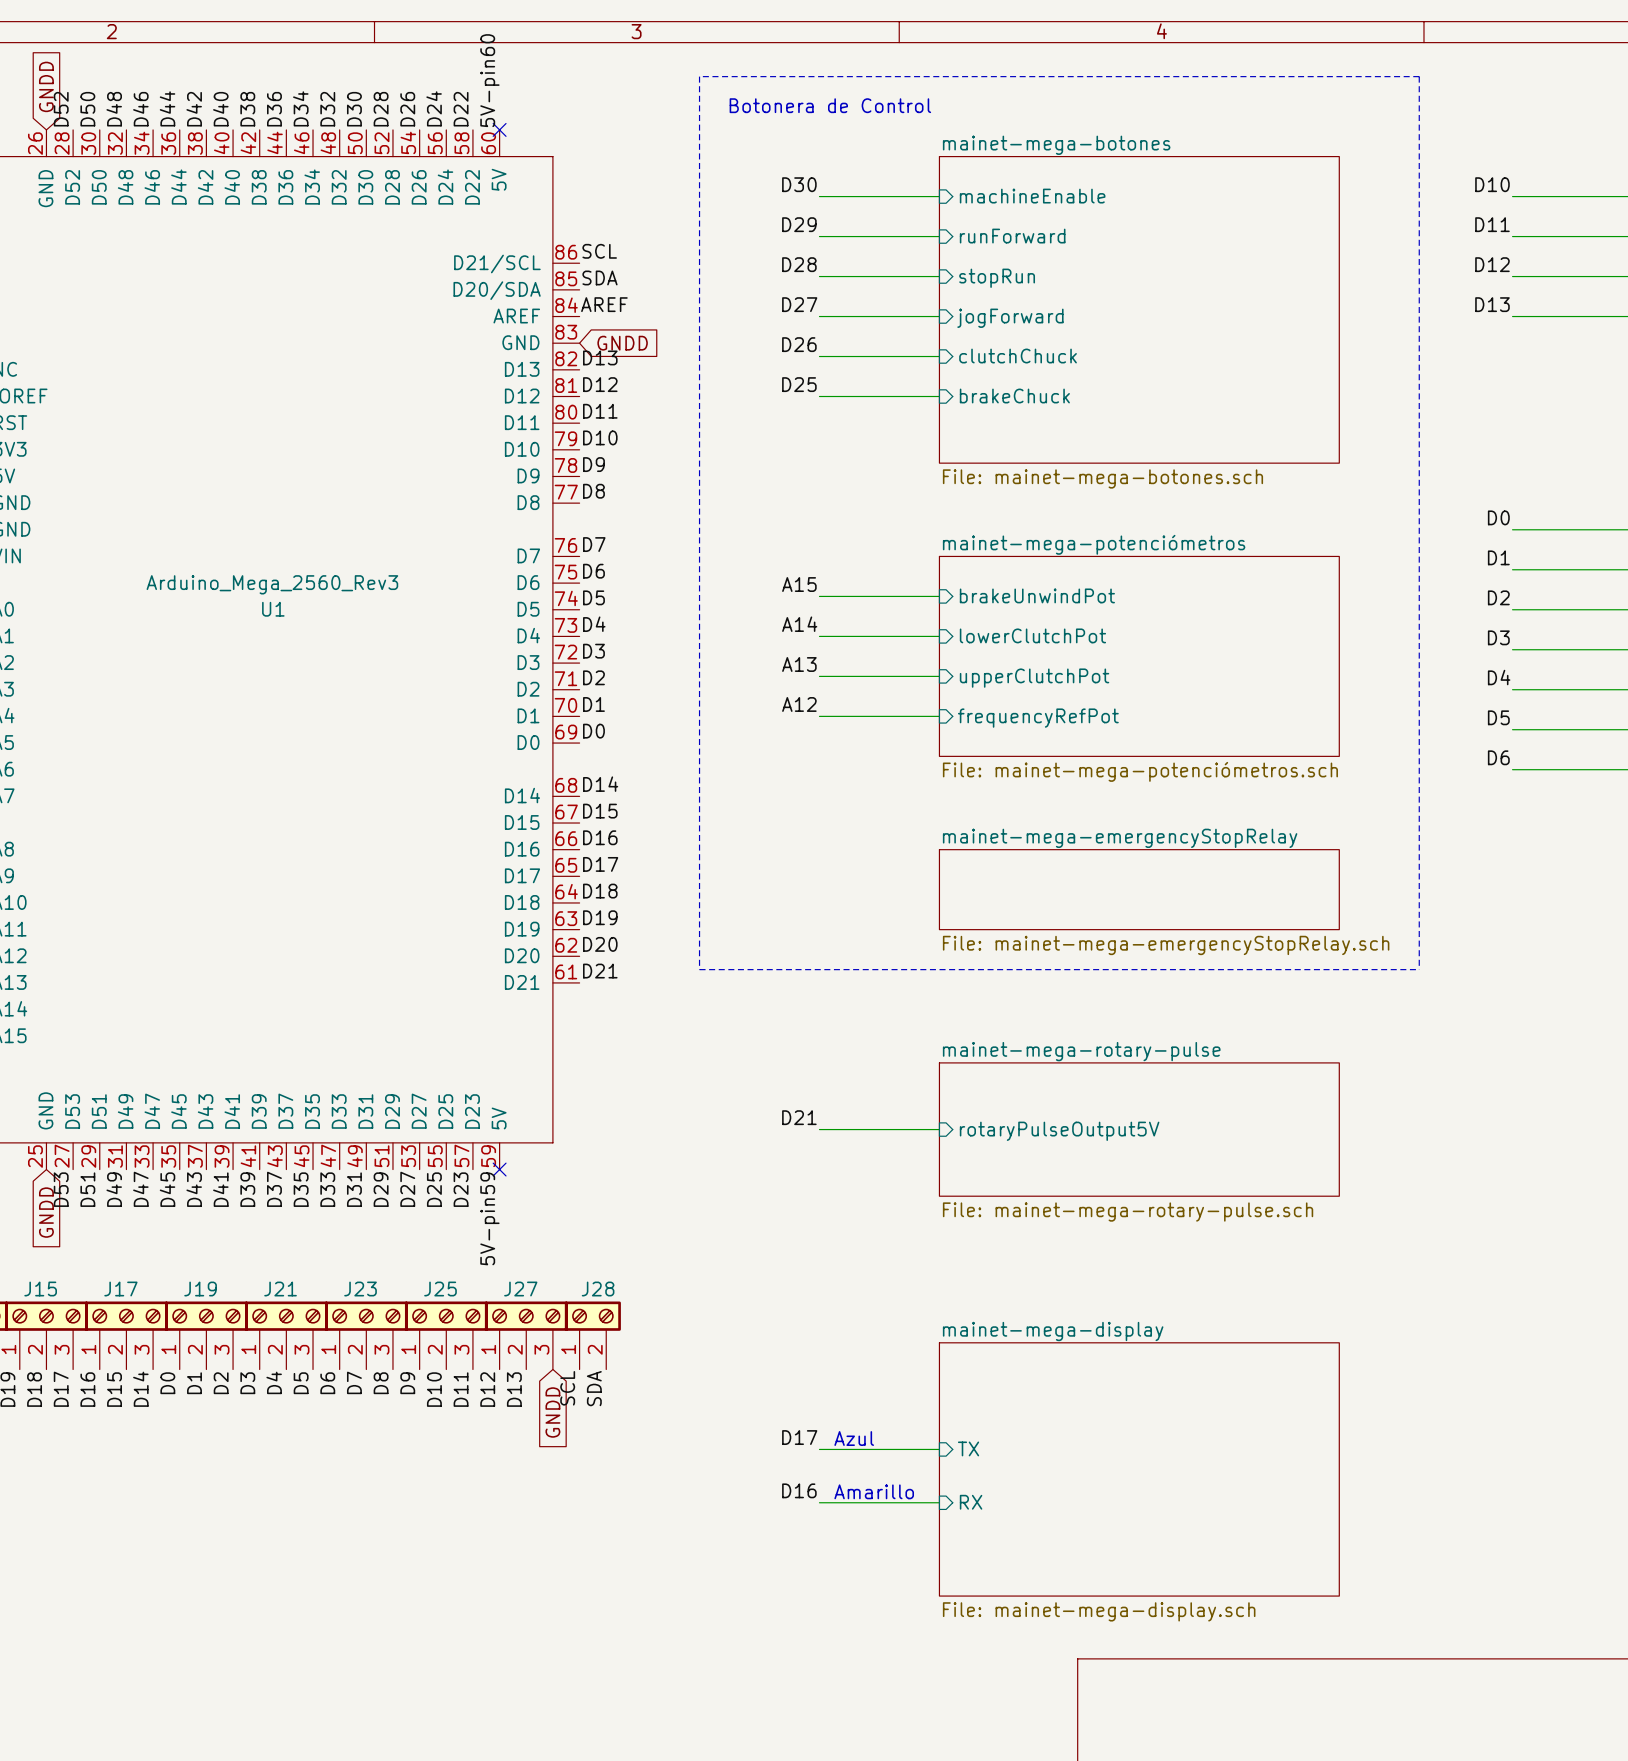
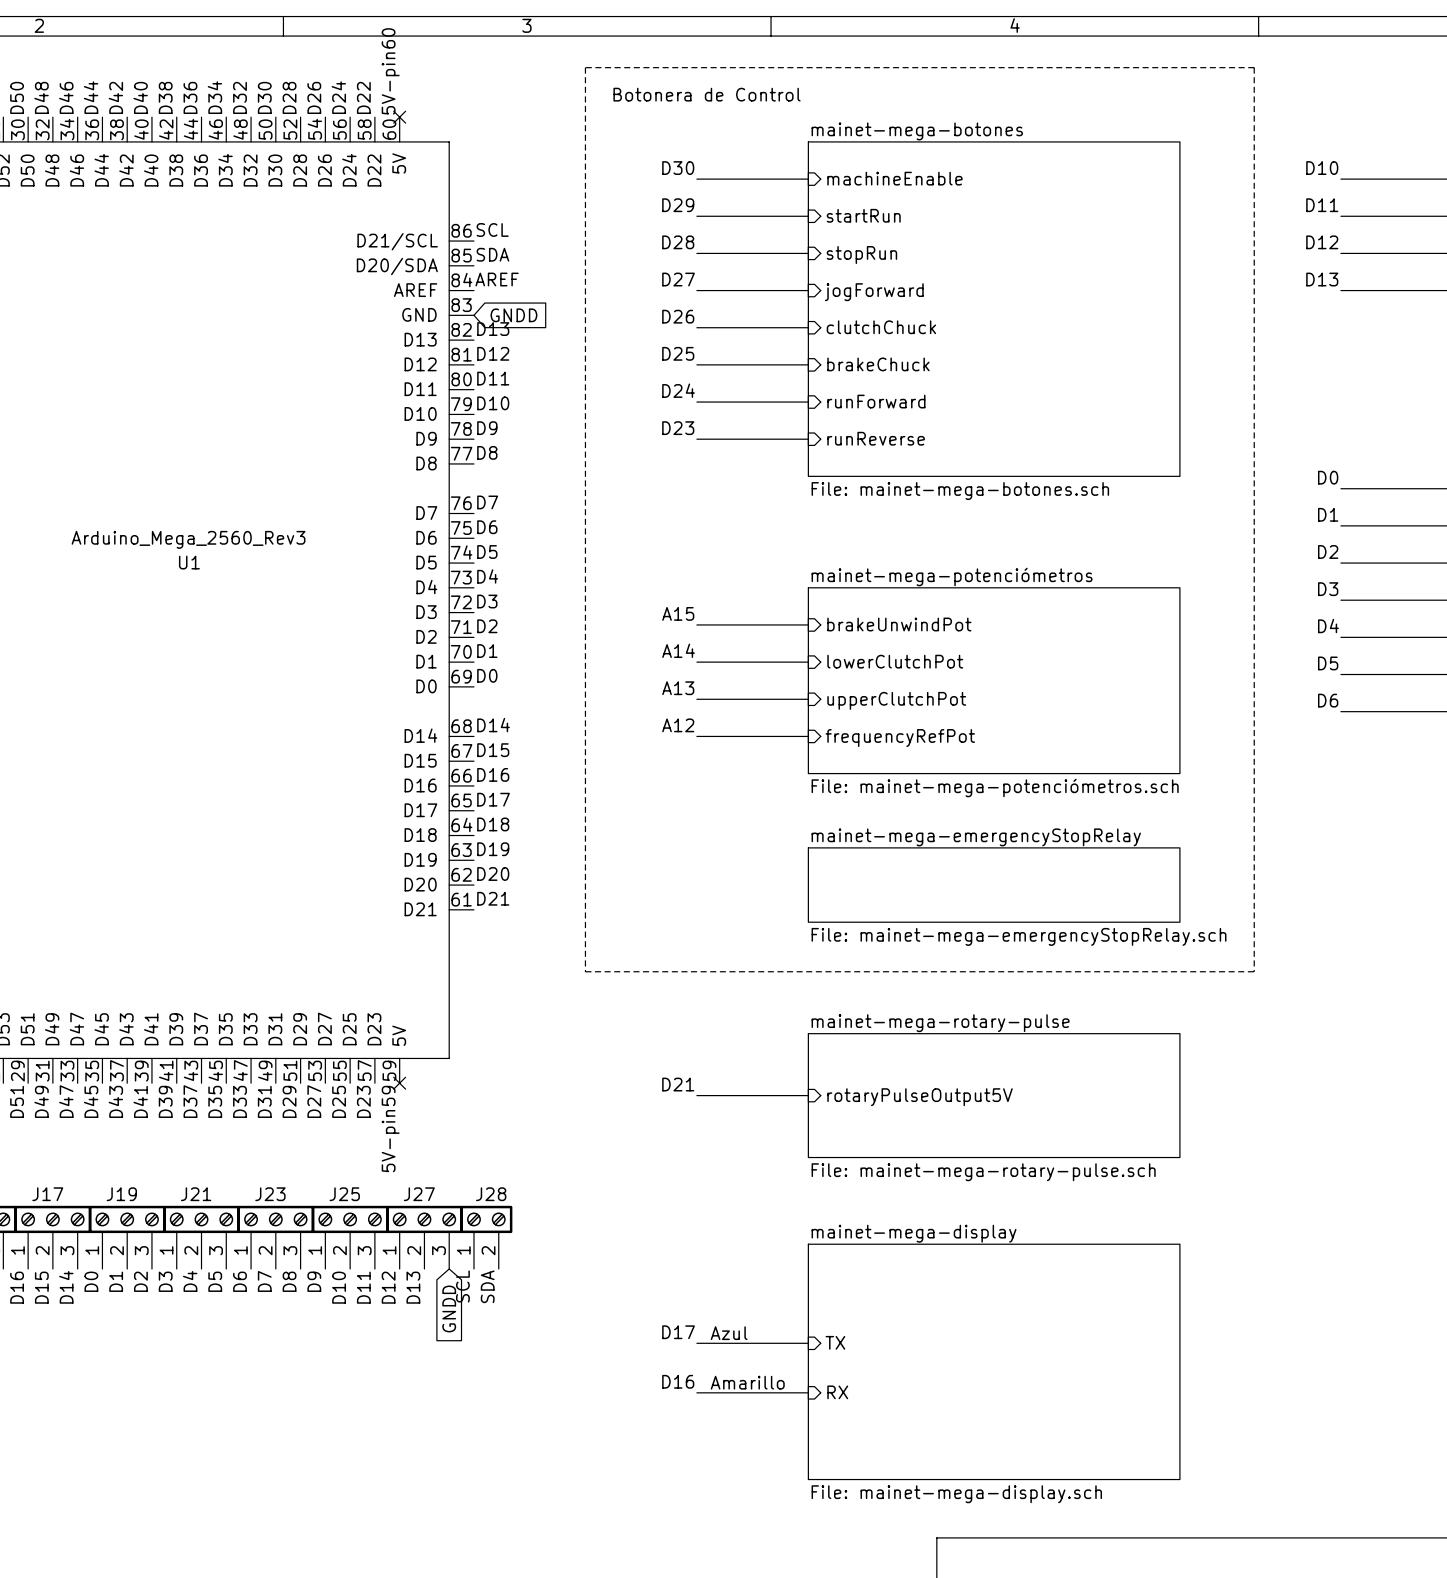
sheet pin: runForward (1012, 236) -> startRun (863, 215)
sheet mainet-mega-botones: File: mainet-mega-botones.sch (1139, 309) -> none
sheet mainet-mega-botones: none -> File: mainet-mega-botones.sch (994, 309)
label: none -> D24 (678, 390)
sheet pin: none -> runForward (876, 401)
label: none -> D23 (678, 428)
sheet pin: none -> runReverse (876, 438)
label: A15 (799, 584) -> none
sheet pin: brakeUnwindPot (1037, 595) -> none
wire: (819, 596) (939, 596) -> (696, 402) (808, 402)
label: A14 (799, 624) -> none
sheet pin: lowerClutchPot (1032, 635) -> none
wire: (819, 636) (939, 636) -> (696, 439) (808, 439)
sheet mainet-mega-potenciómetros position: (1139, 656) -> (994, 680)
label: A13 (799, 664) -> A15 (678, 613)
sheet pin: upperClutchPot (1034, 678) -> brakeUnwindPot (899, 624)
label: A12 (799, 704) -> A14 (678, 650)
sheet pin: frequencyRefPot (1038, 718) -> lowerClutchPot (895, 661)
label: none -> A13 (678, 688)
wire: none -> (696, 699) (808, 699)
sheet pin: none -> upperClutchPot (896, 700)
label: none -> A12 (678, 725)
wire: none -> (696, 736) (808, 736)
sheet pin: none -> frequencyRefPot (900, 738)
sheet mainet-mega-emergencyStopRelay position: (1139, 889) -> (994, 885)
line: (699, 969) (1419, 969) -> (585, 897) (585, 971) (1254, 971) (1254, 897)
label position: D21 (799, 1117) -> D21 (678, 1084)
wire: (819, 1129) (939, 1129) -> (696, 1095) (808, 1095)
sheet mainet-mega-rotary-pulse position: (1139, 1129) -> (994, 1095)
sheet pin position: rotaryPulseOutput5V (1059, 1131) -> rotaryPulseOutput5V (920, 1097)

